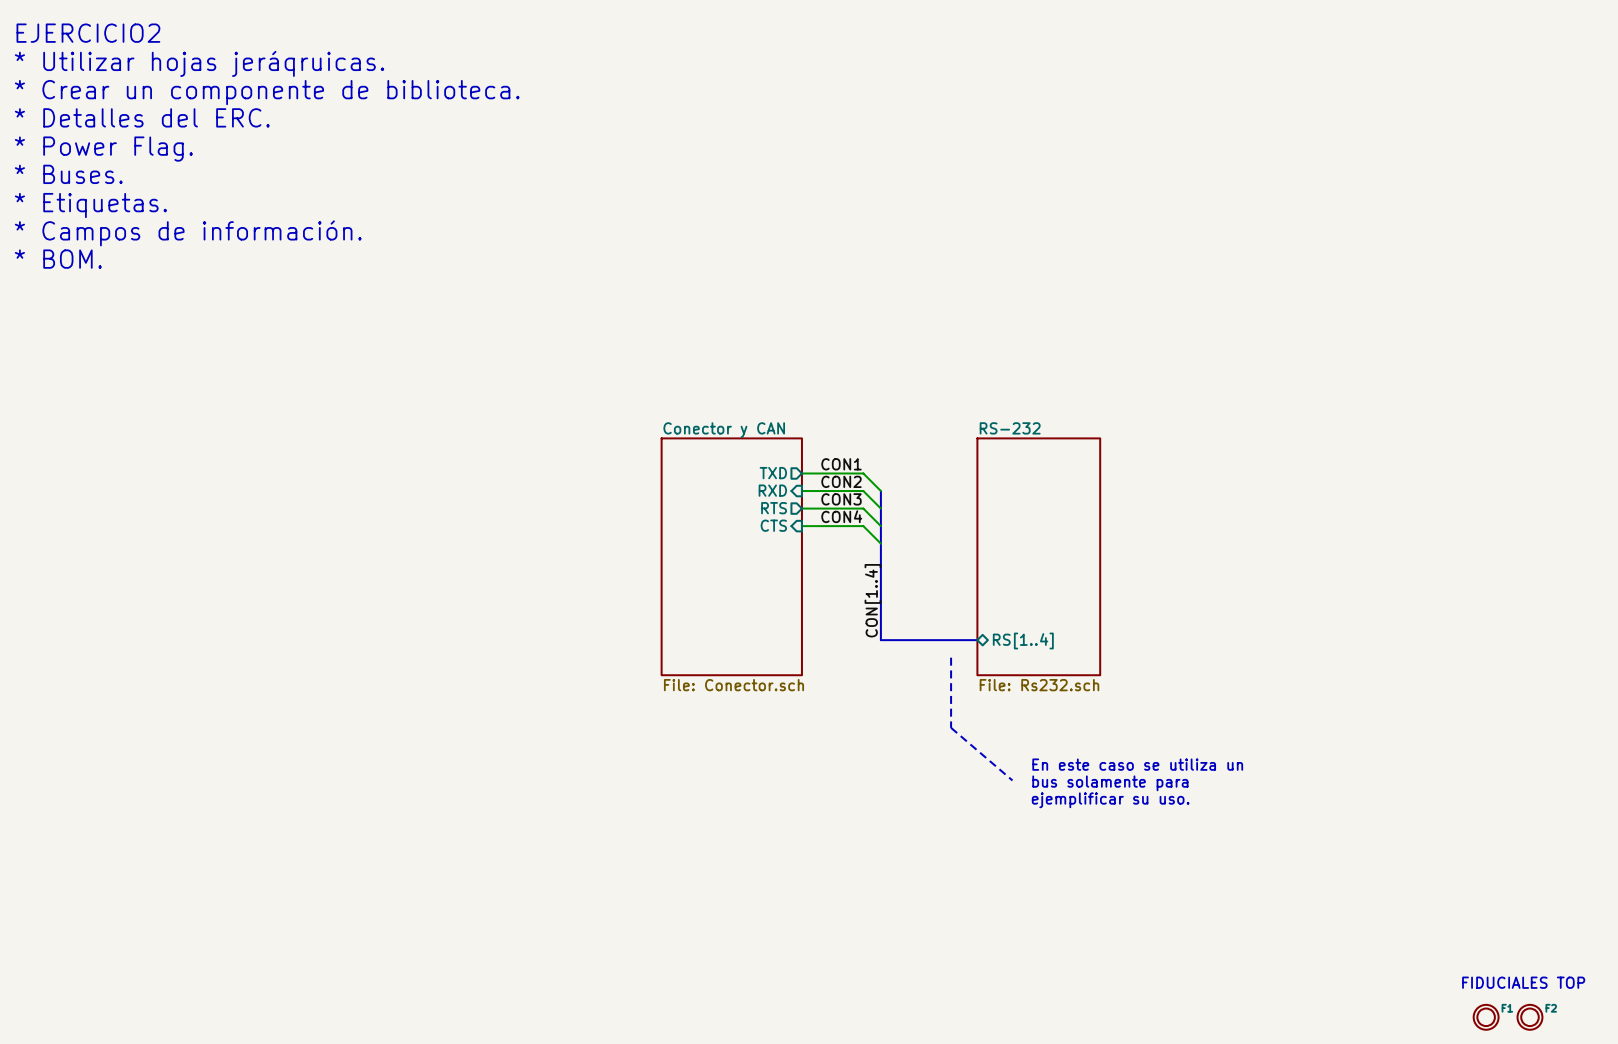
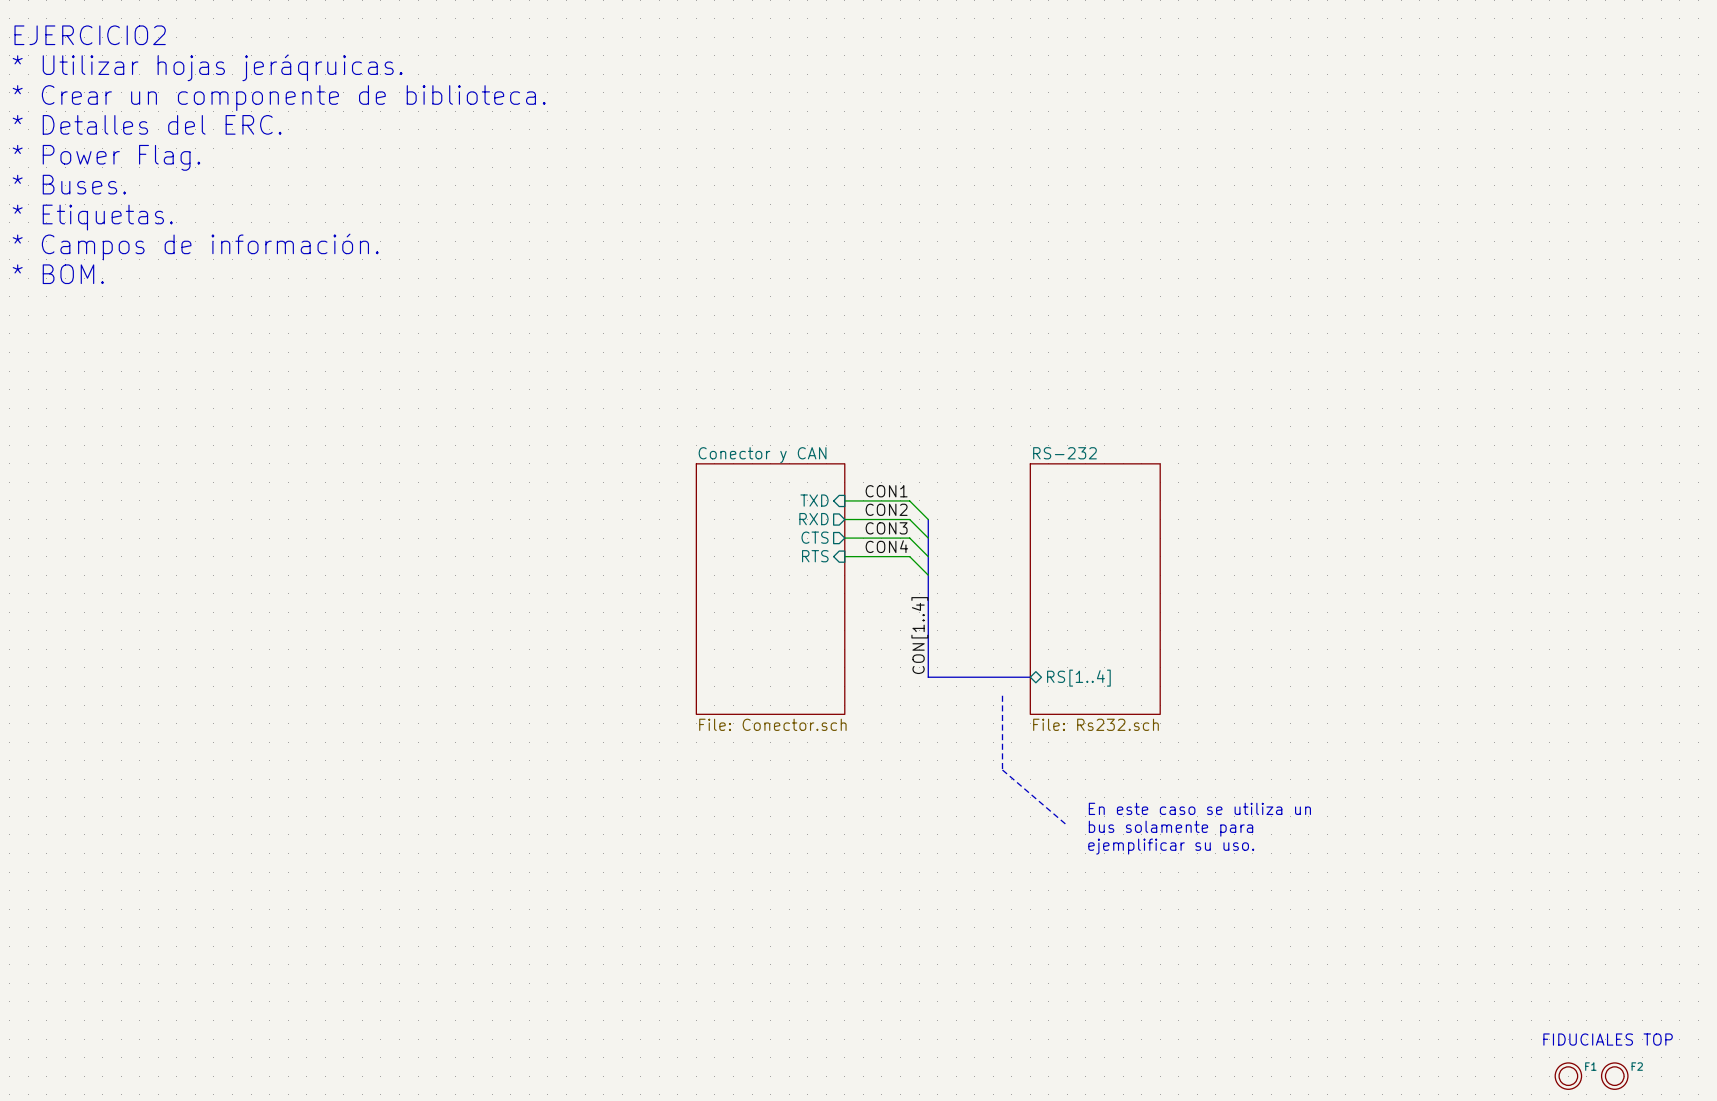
sheet pin shape: output (773, 473) -> input (814, 500)
sheet pin shape: input (772, 490) -> output (813, 519)
sheet pin: RTS (774, 508) -> CTS (815, 537)
sheet pin: CTS (773, 525) -> RTS (815, 556)

